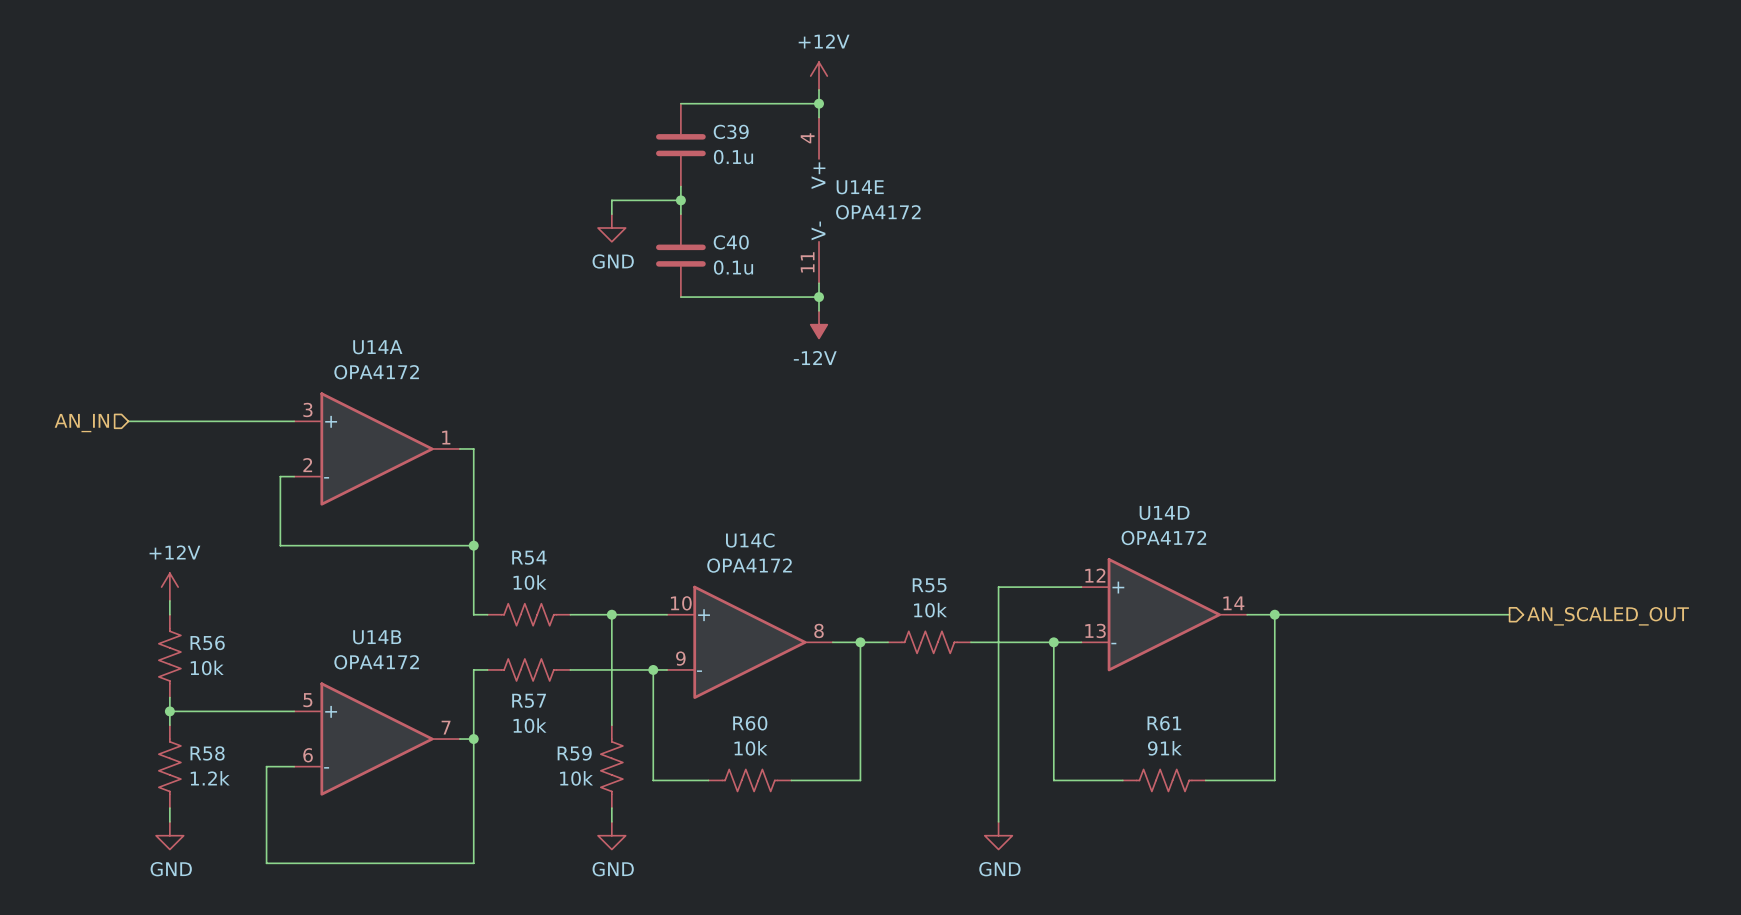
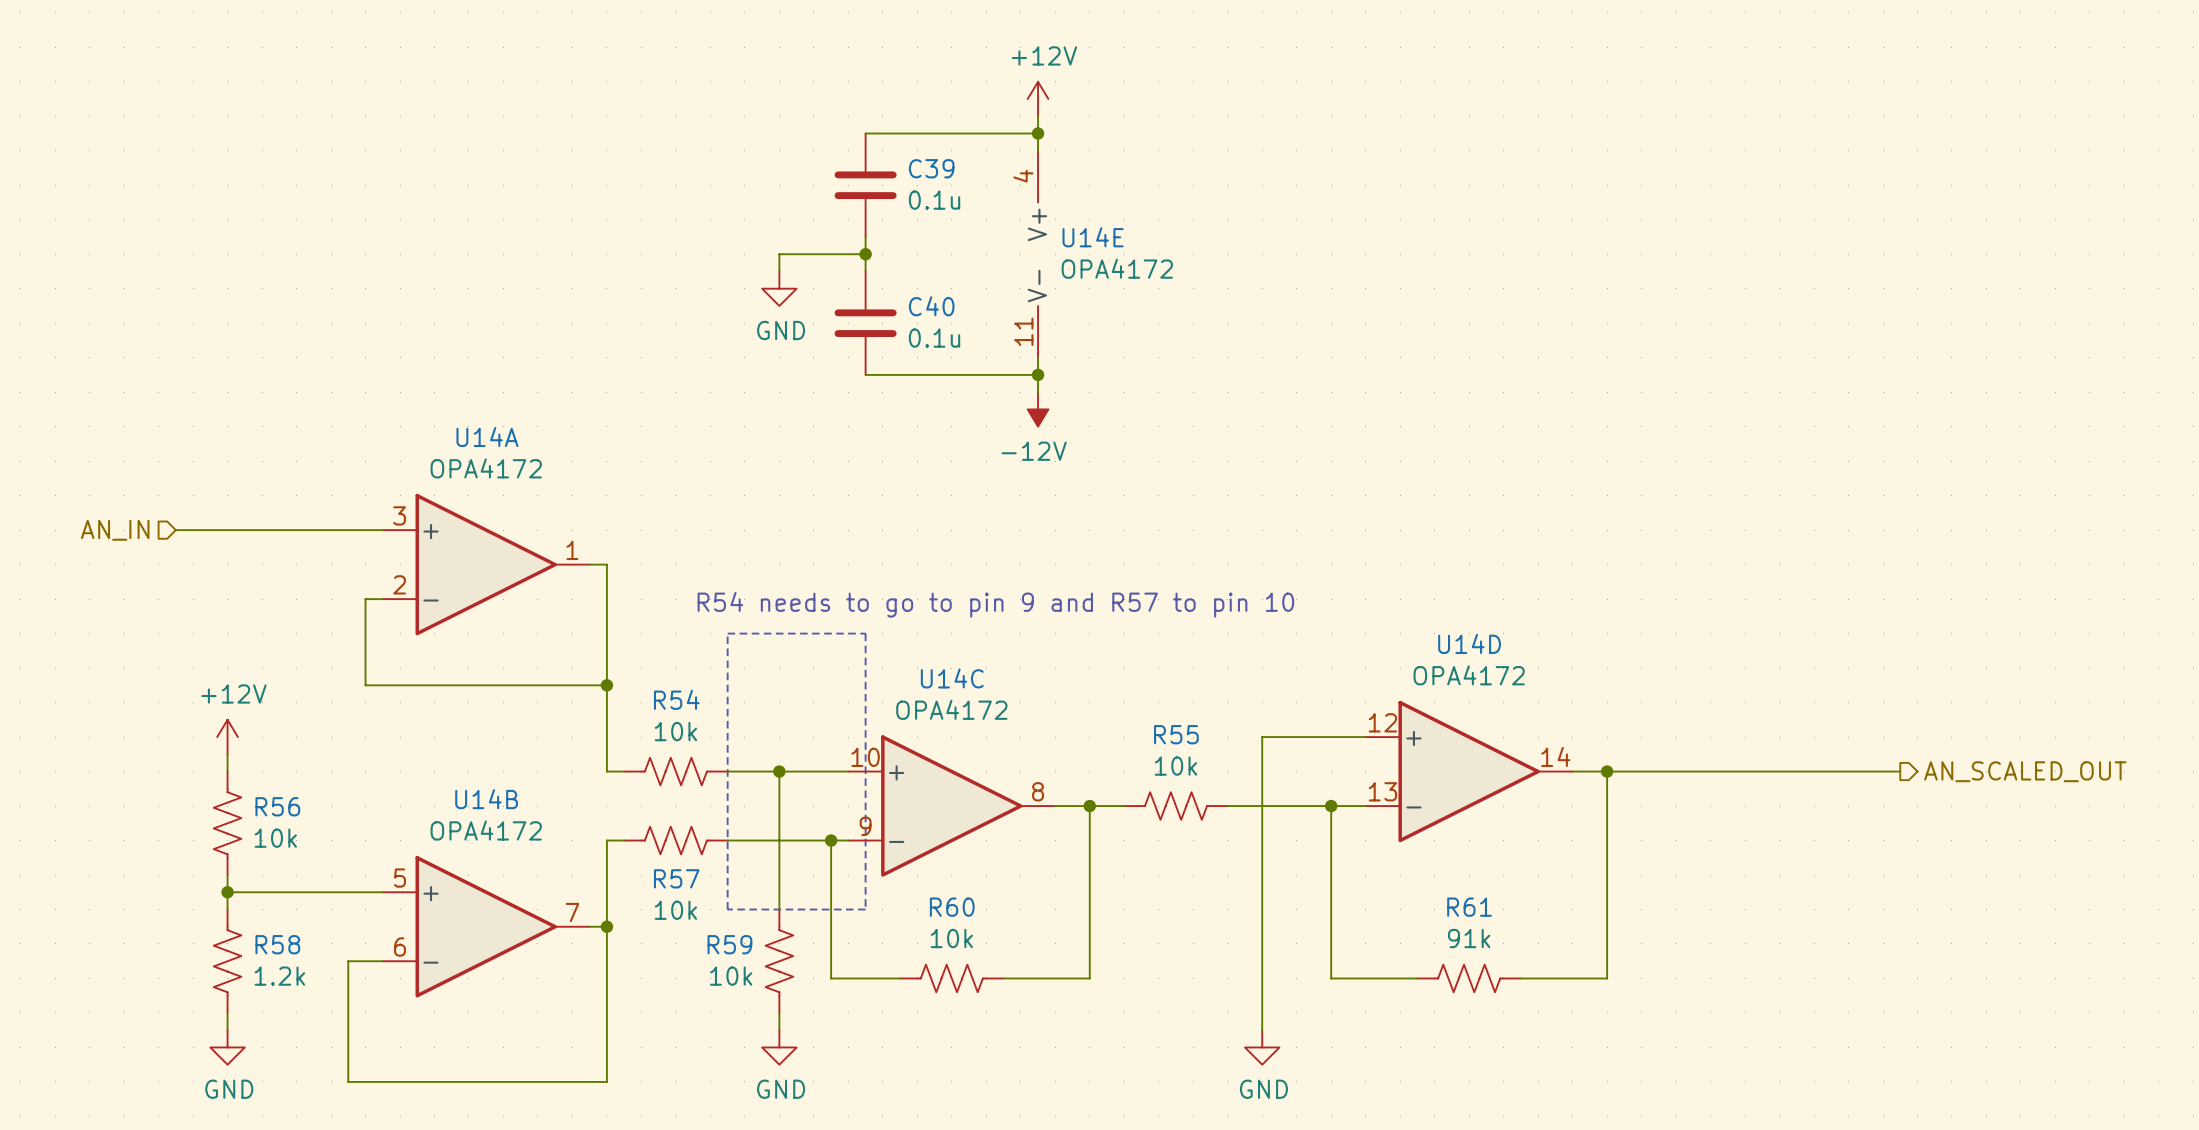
text: none -> R54 needs to go to pin 9 and R57 to pin 10 (995, 604)
line: none -> (727, 633) (727, 909) (865, 909) (865, 633) (727, 633)

